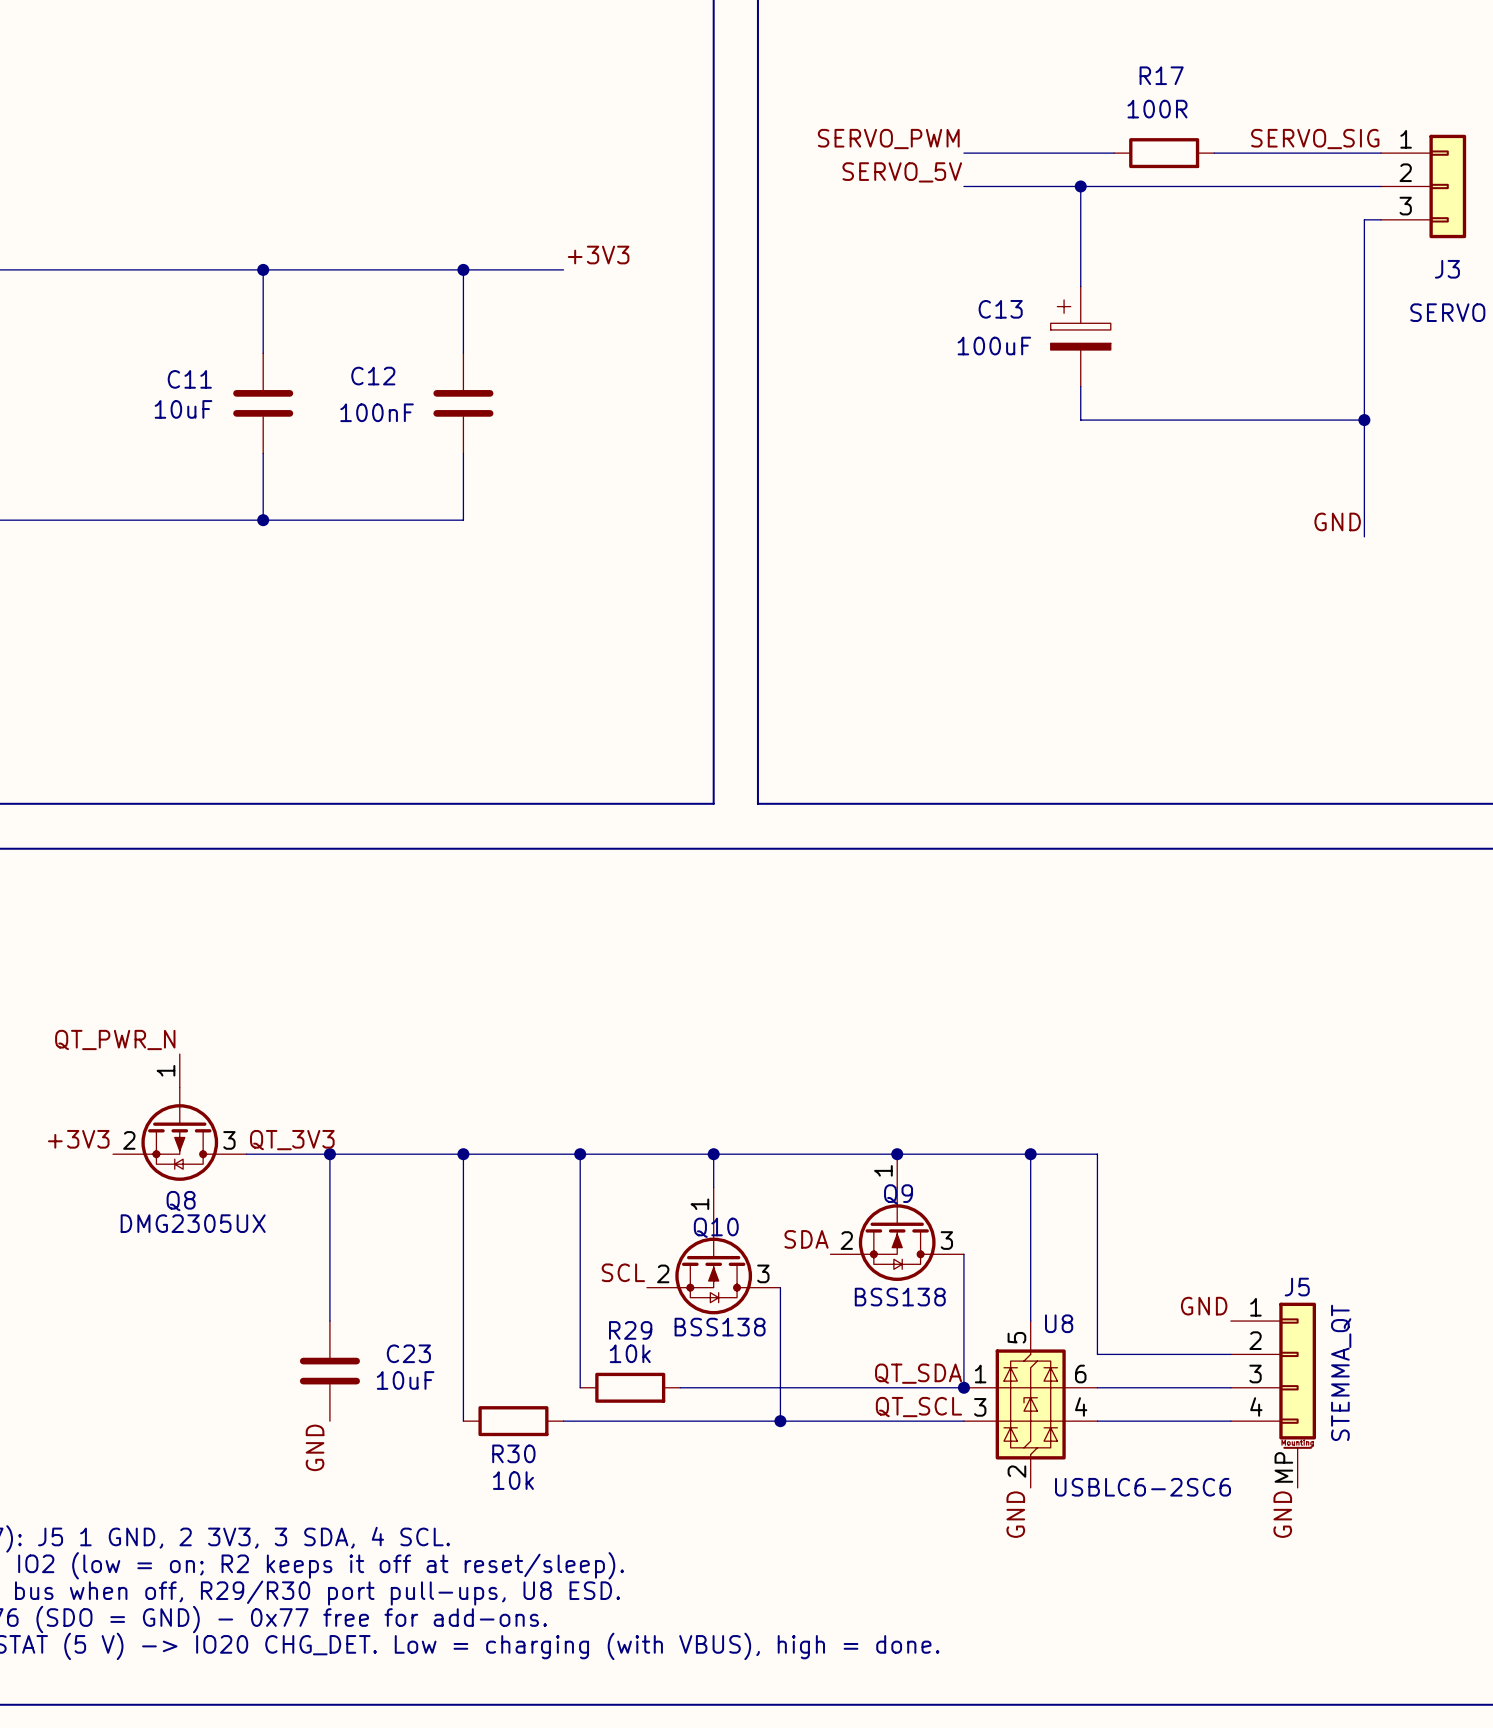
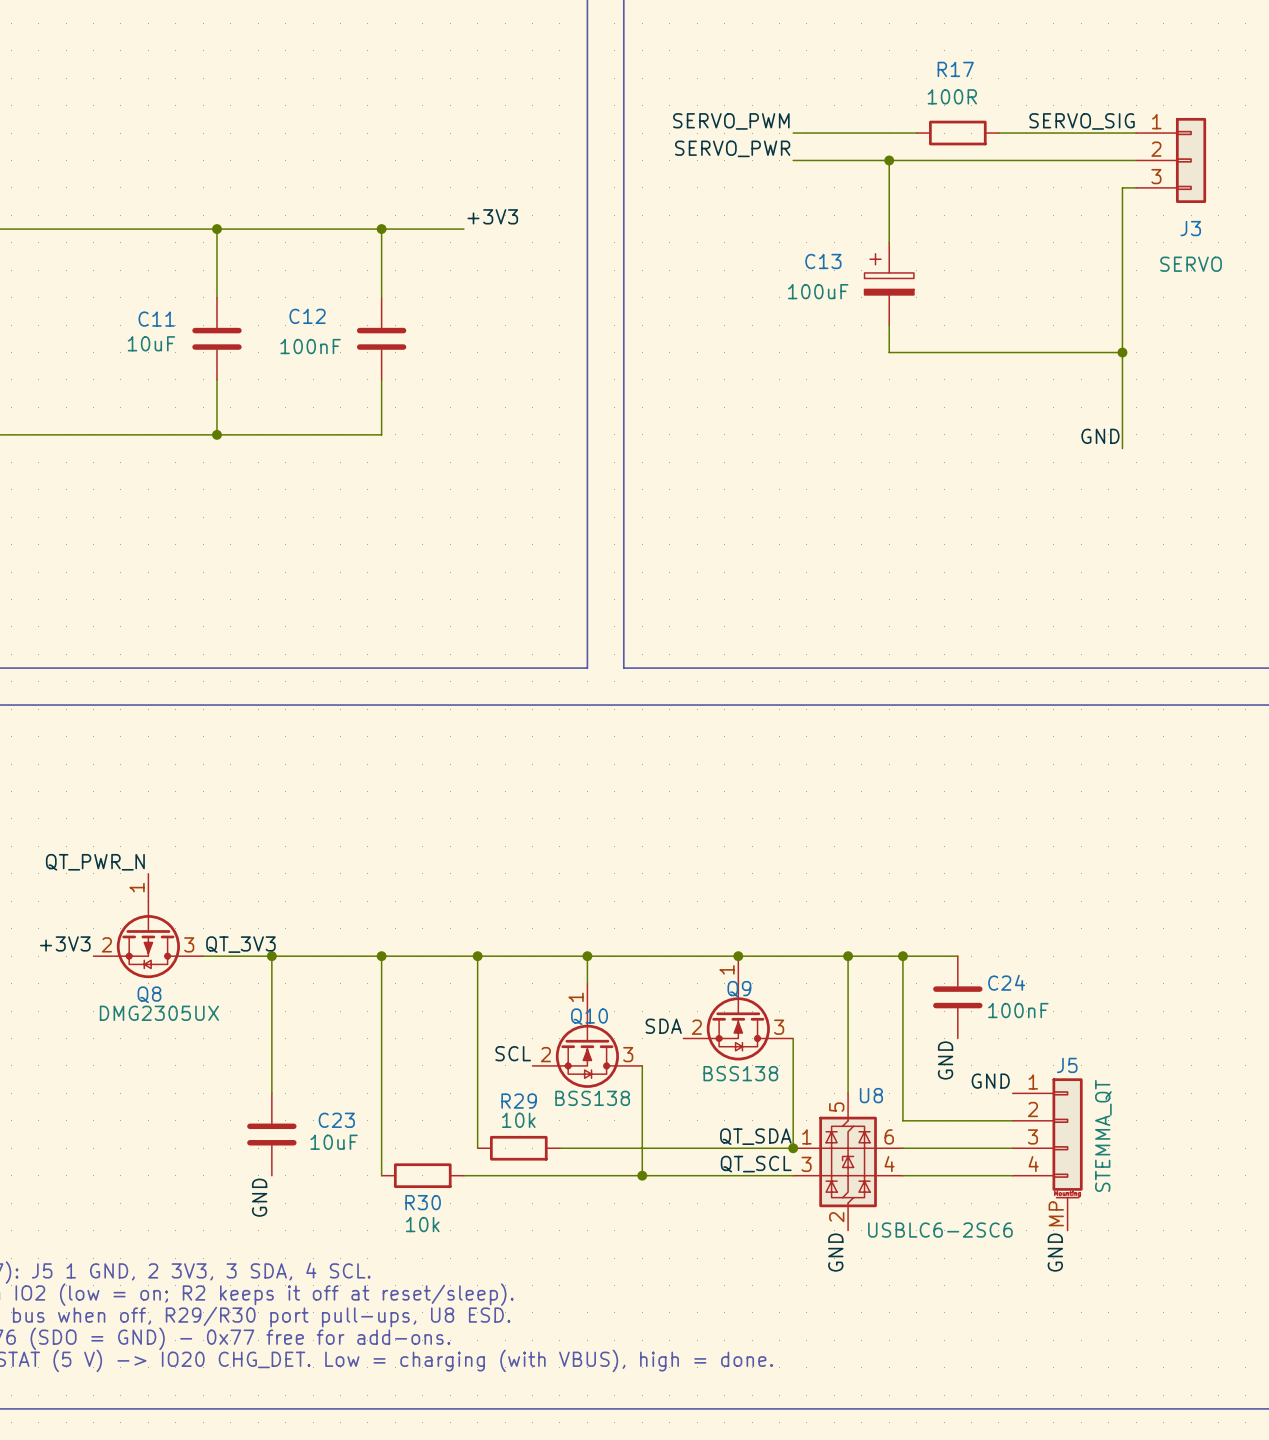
label: SERVO_5V (902, 172) -> SERVO_PWR (732, 148)
wire: none -> (902, 956) (957, 956)
junction: none -> (902, 956)
C24: none -> 100nF (957, 997)
label: none -> GND (945, 1060)

